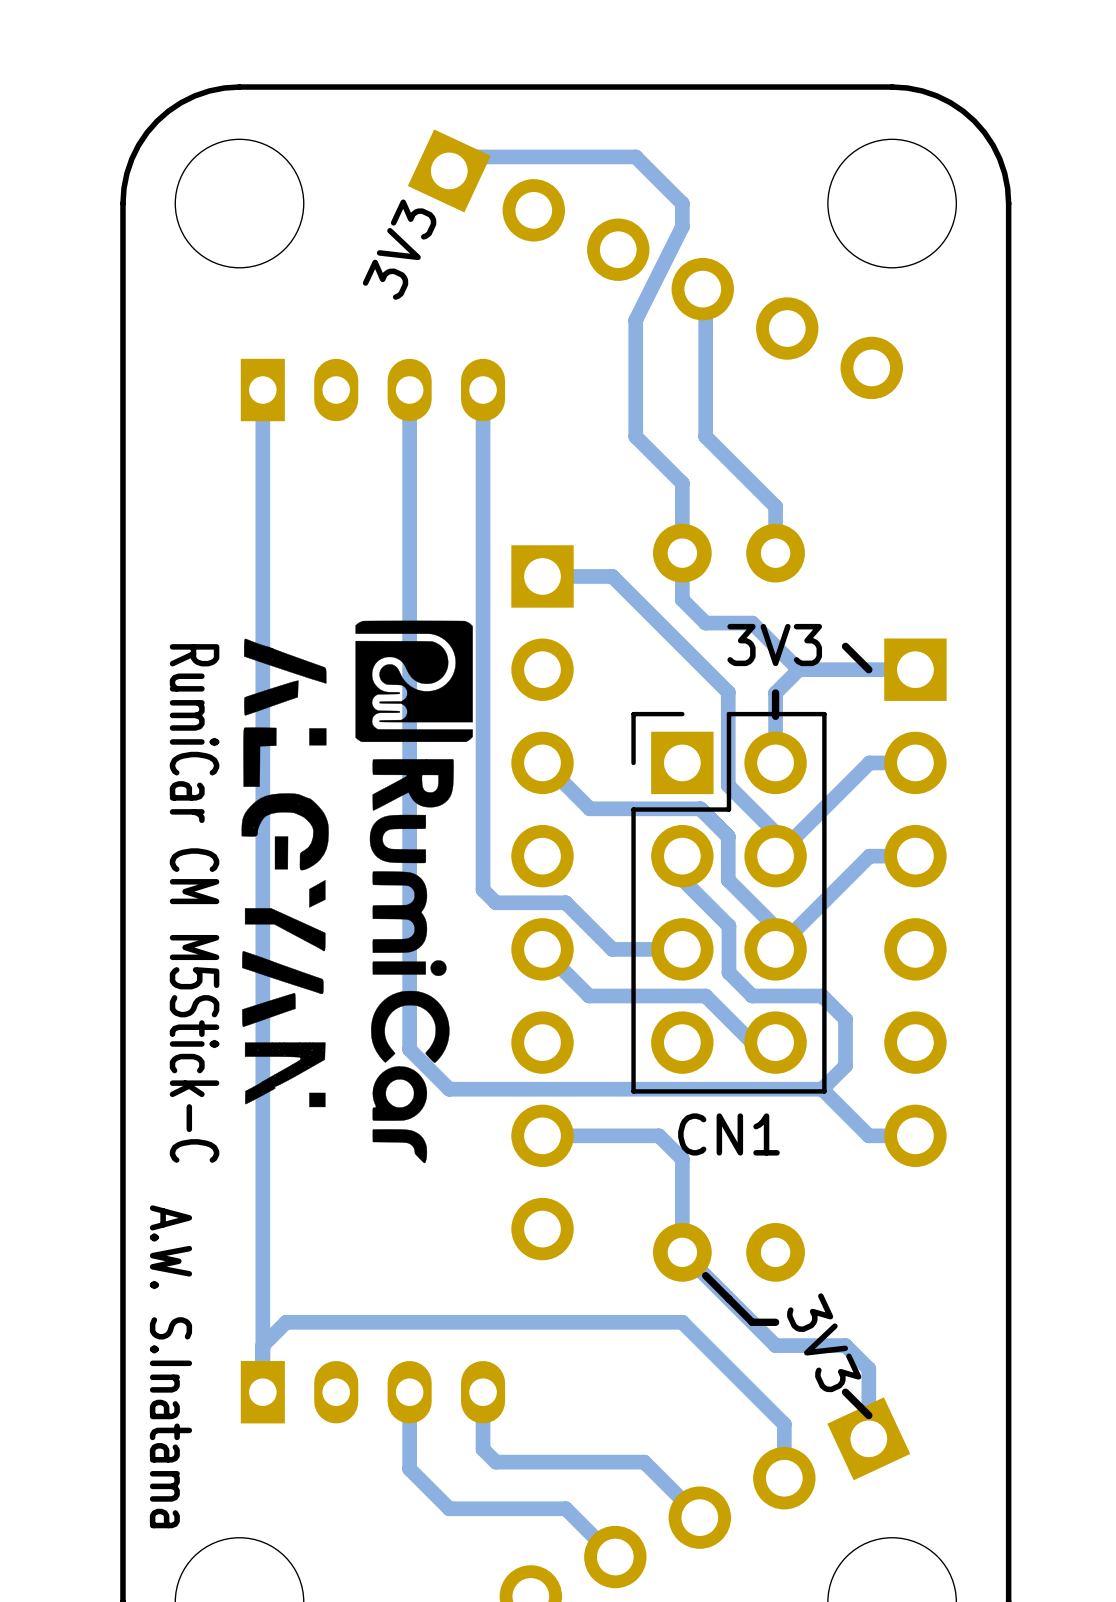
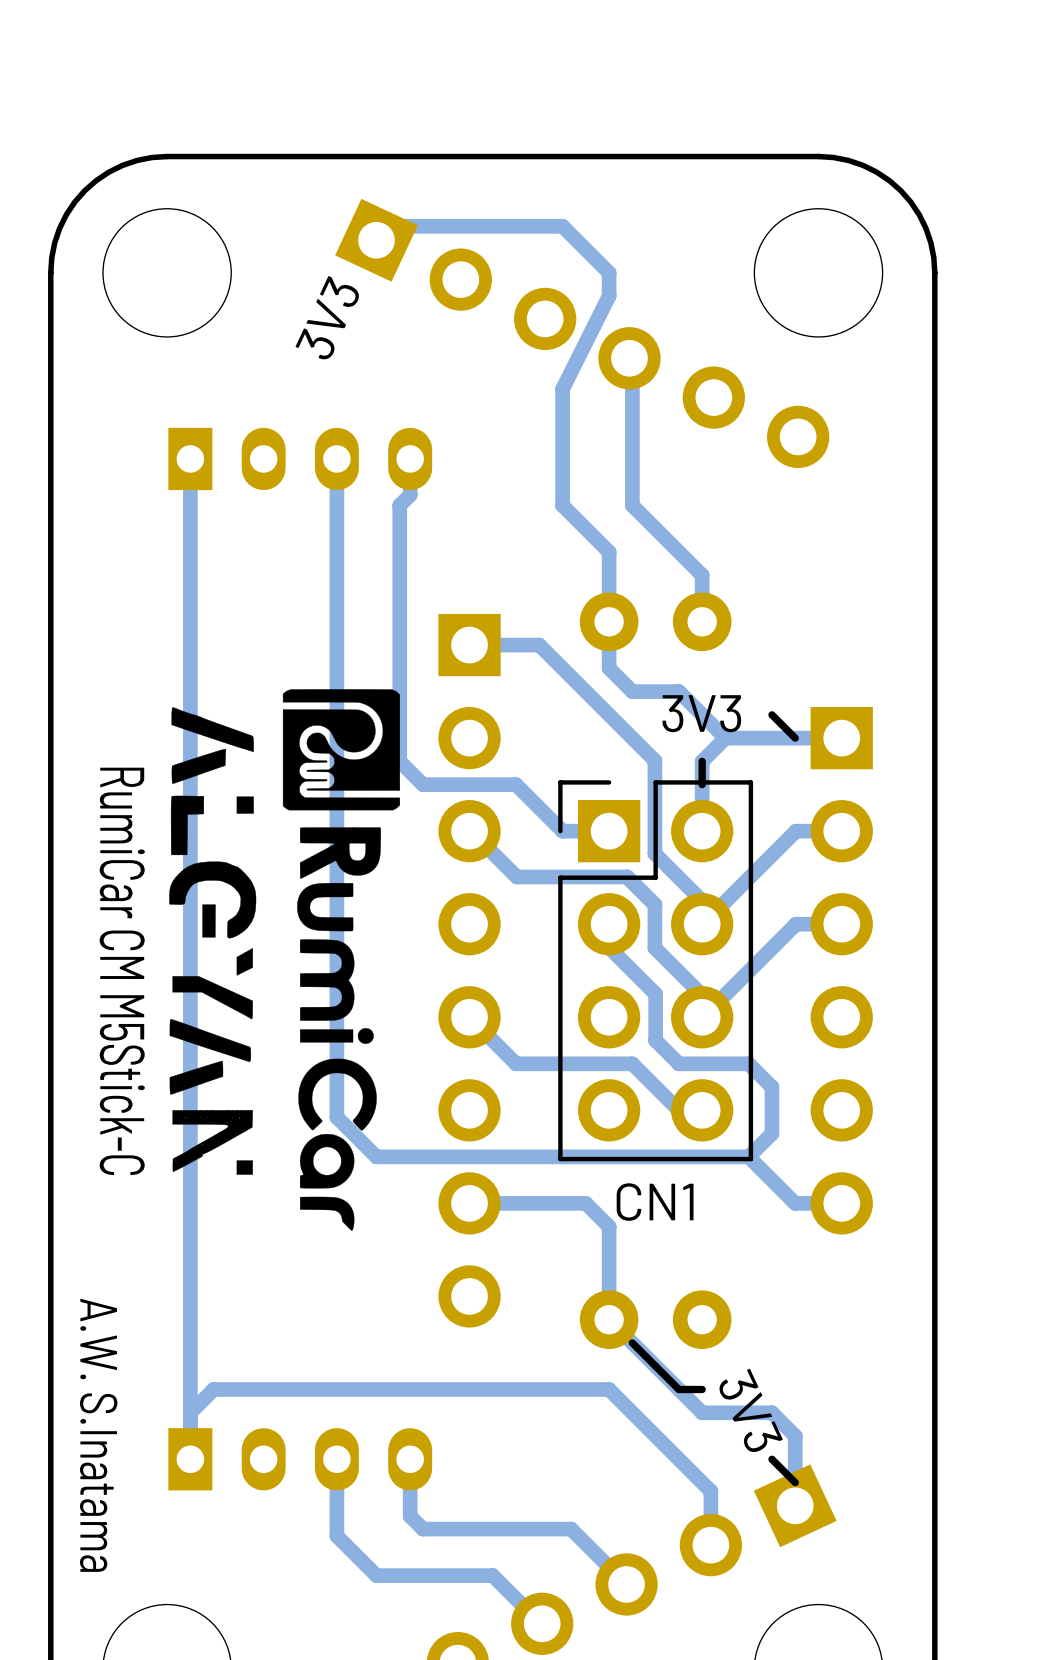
track: (483, 426) (483, 889) (495, 902) (565, 902) (612, 949) (682, 949) -> (410, 495) (399, 505) (399, 761) (423, 784) (516, 784) (562, 831) (609, 831)

